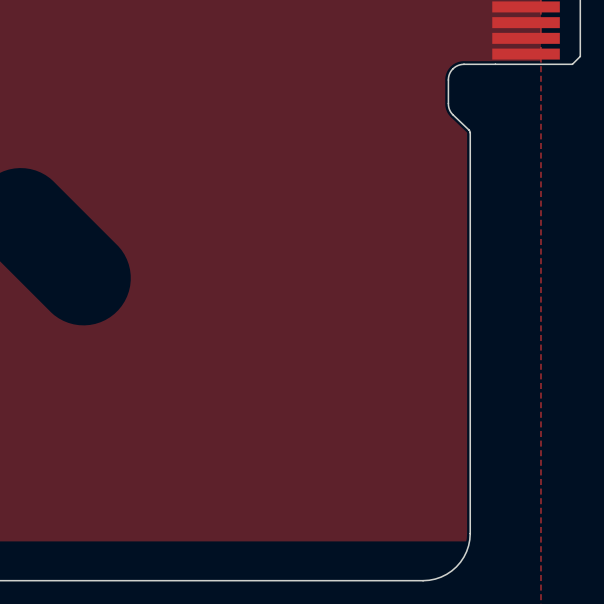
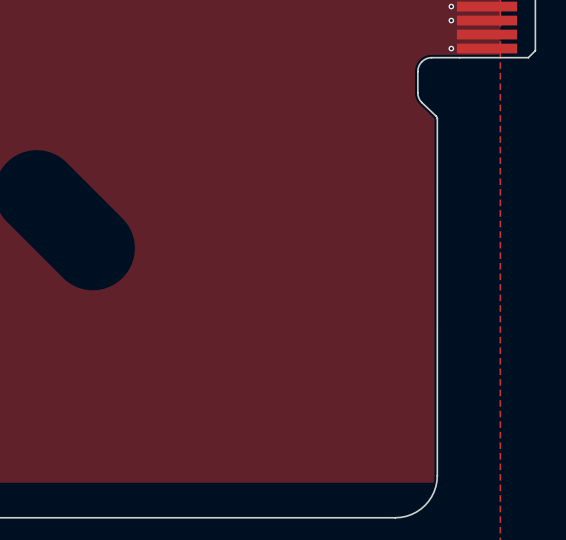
via: none -> (451, 6)
via: none -> (451, 20)
via: none -> (451, 48)

